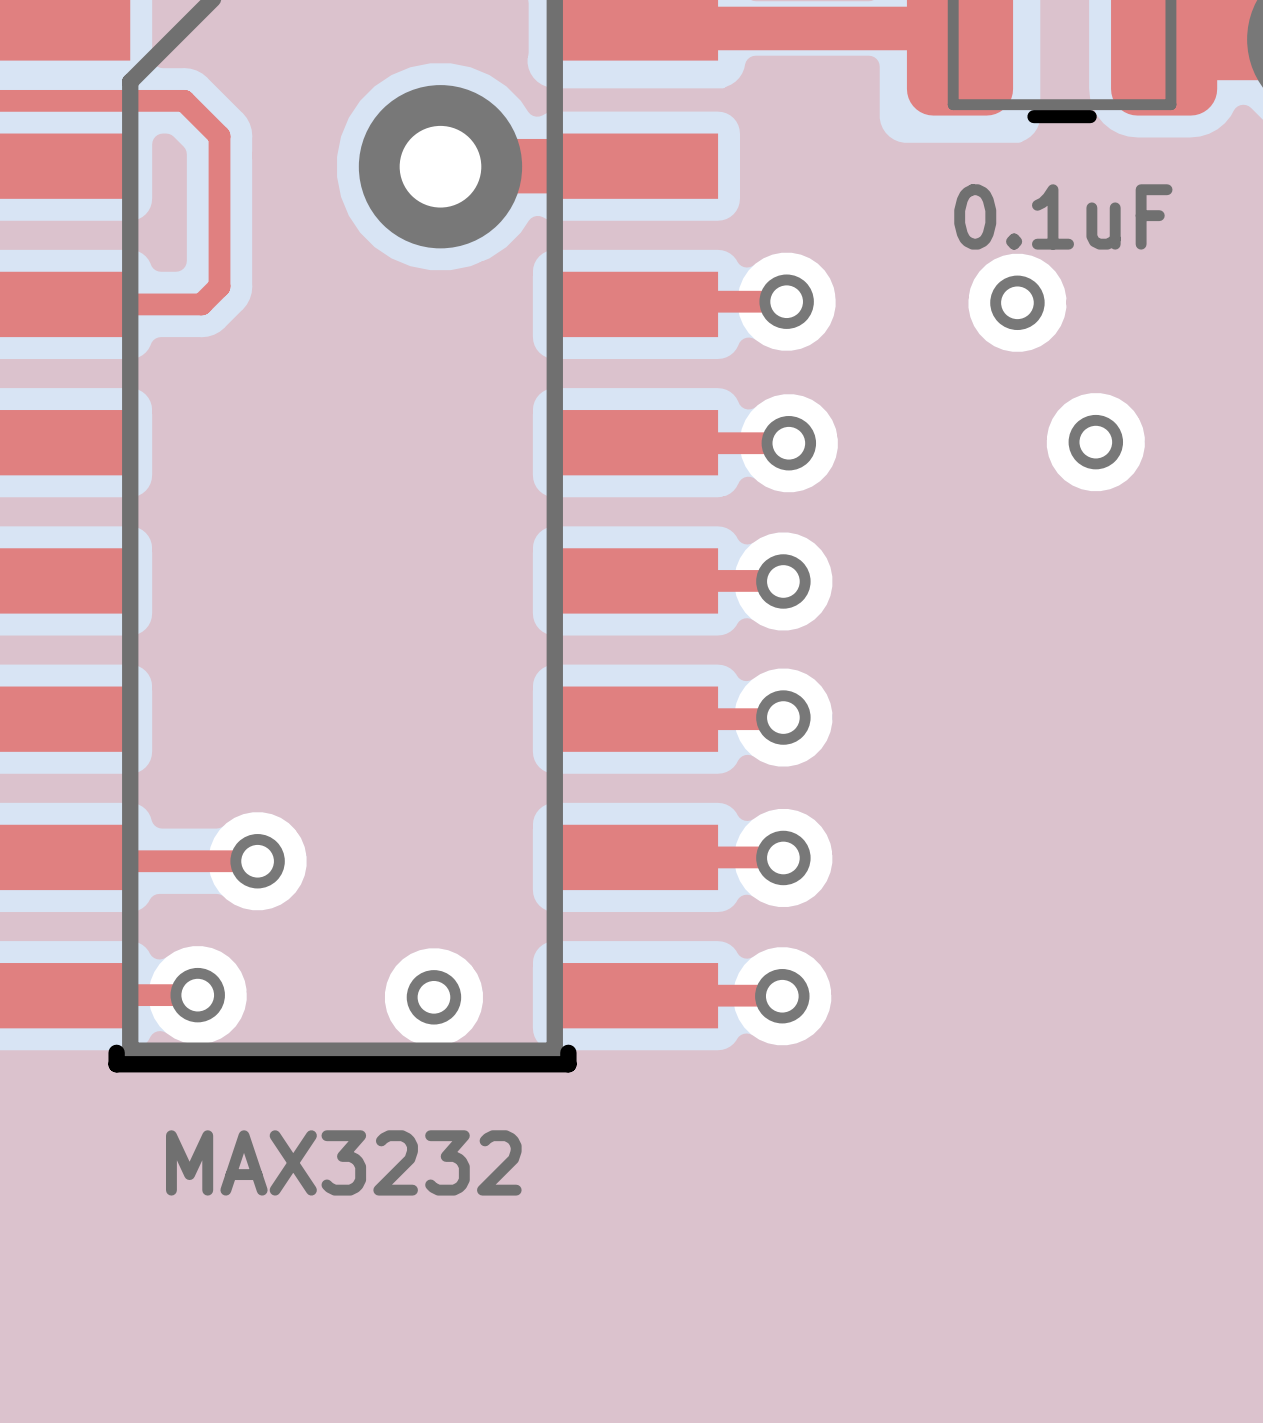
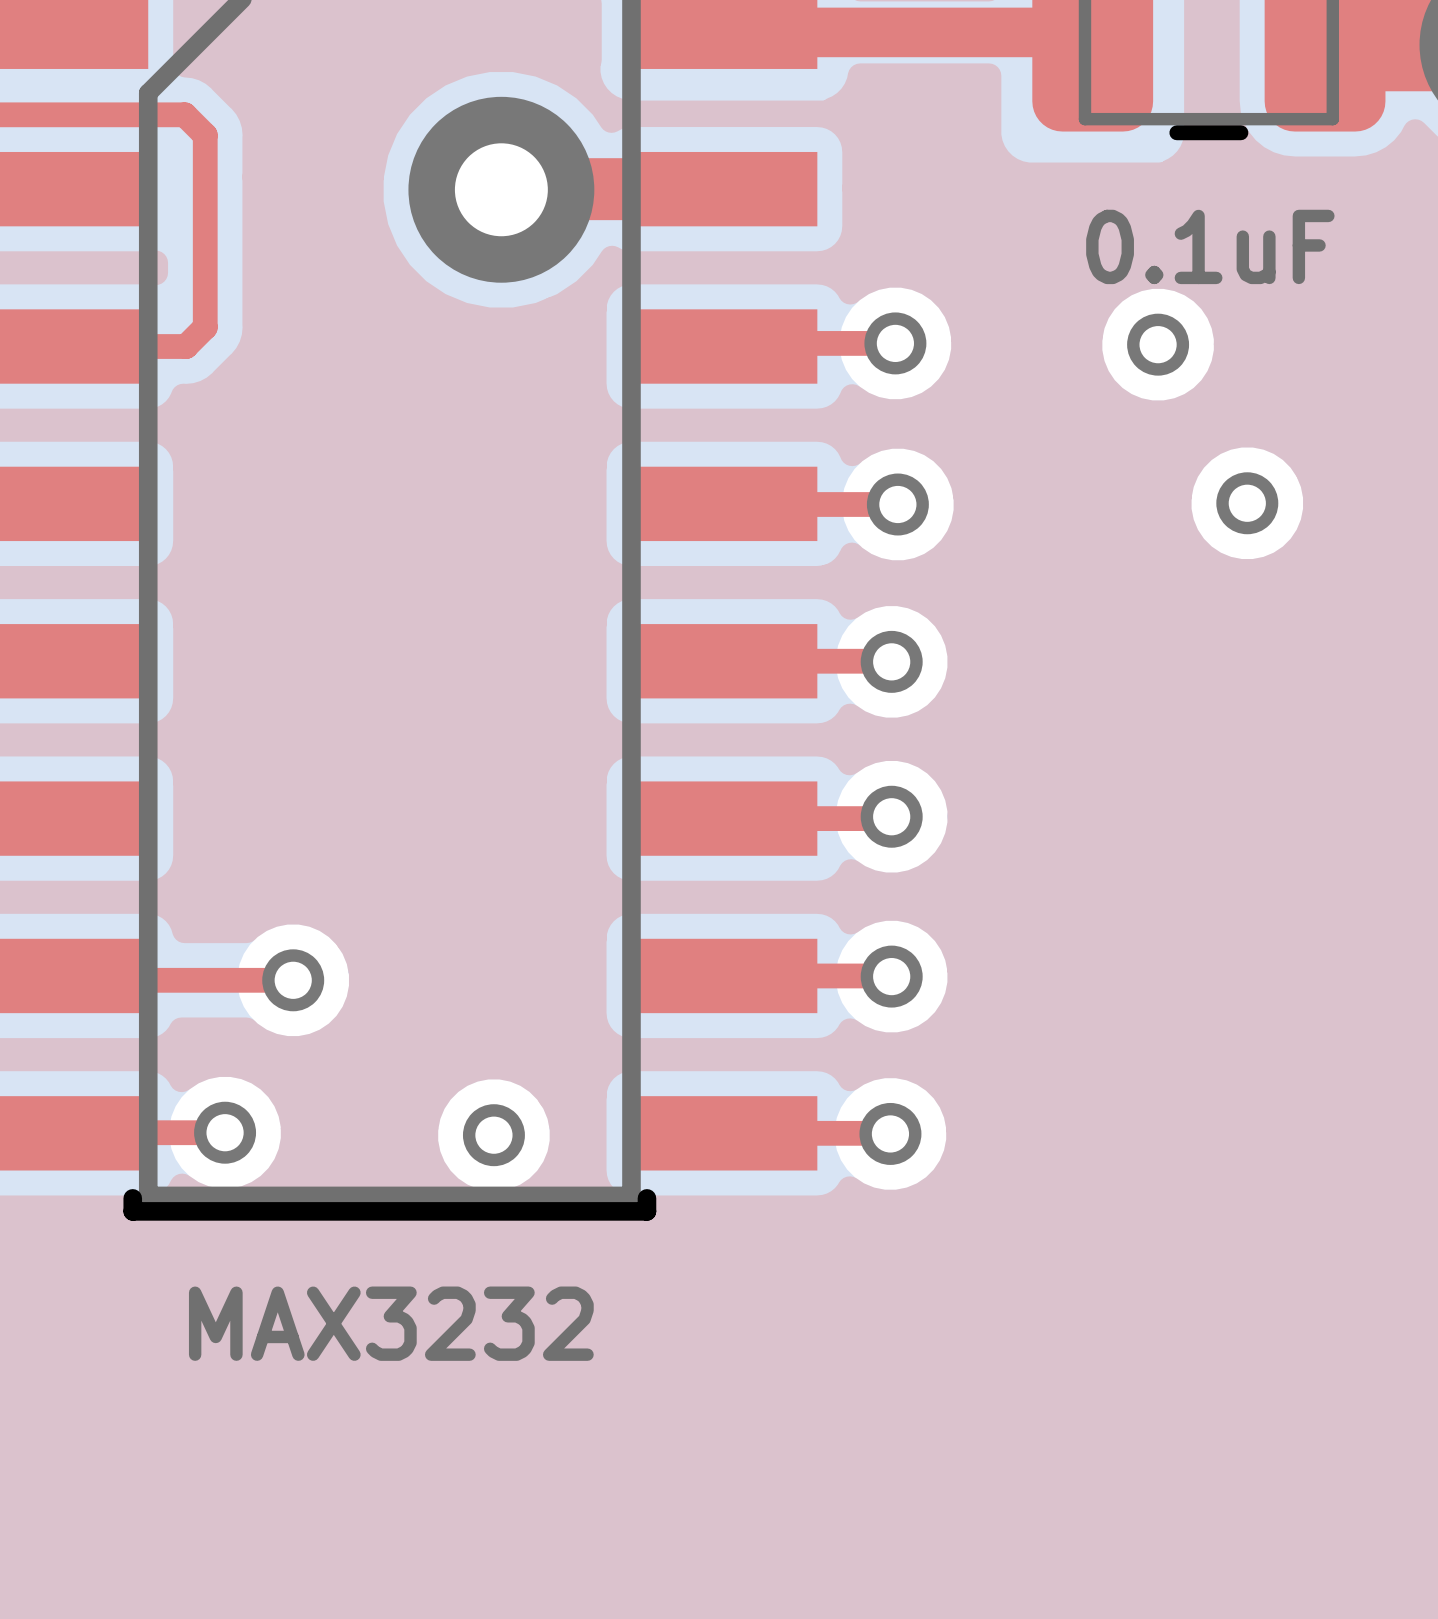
top track: (162, 100) (184, 100) (219, 136) (219, 286) (201, 304) (163, 304) -> (184, 114) (205, 135) (205, 327) (186, 346)

